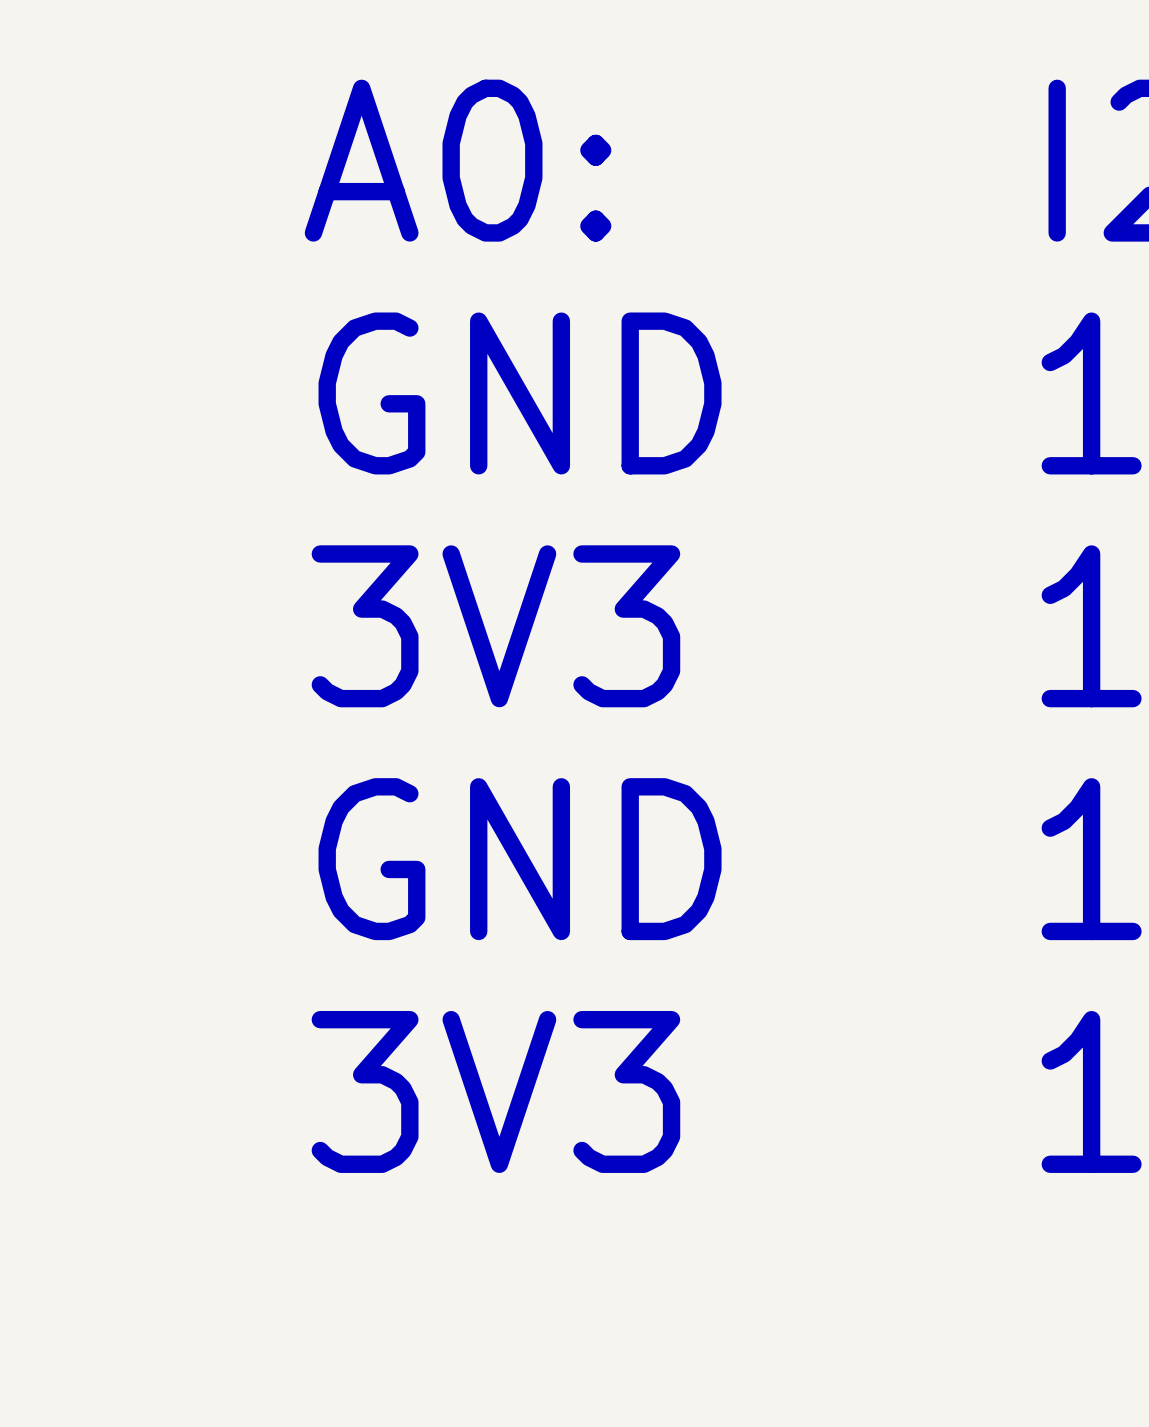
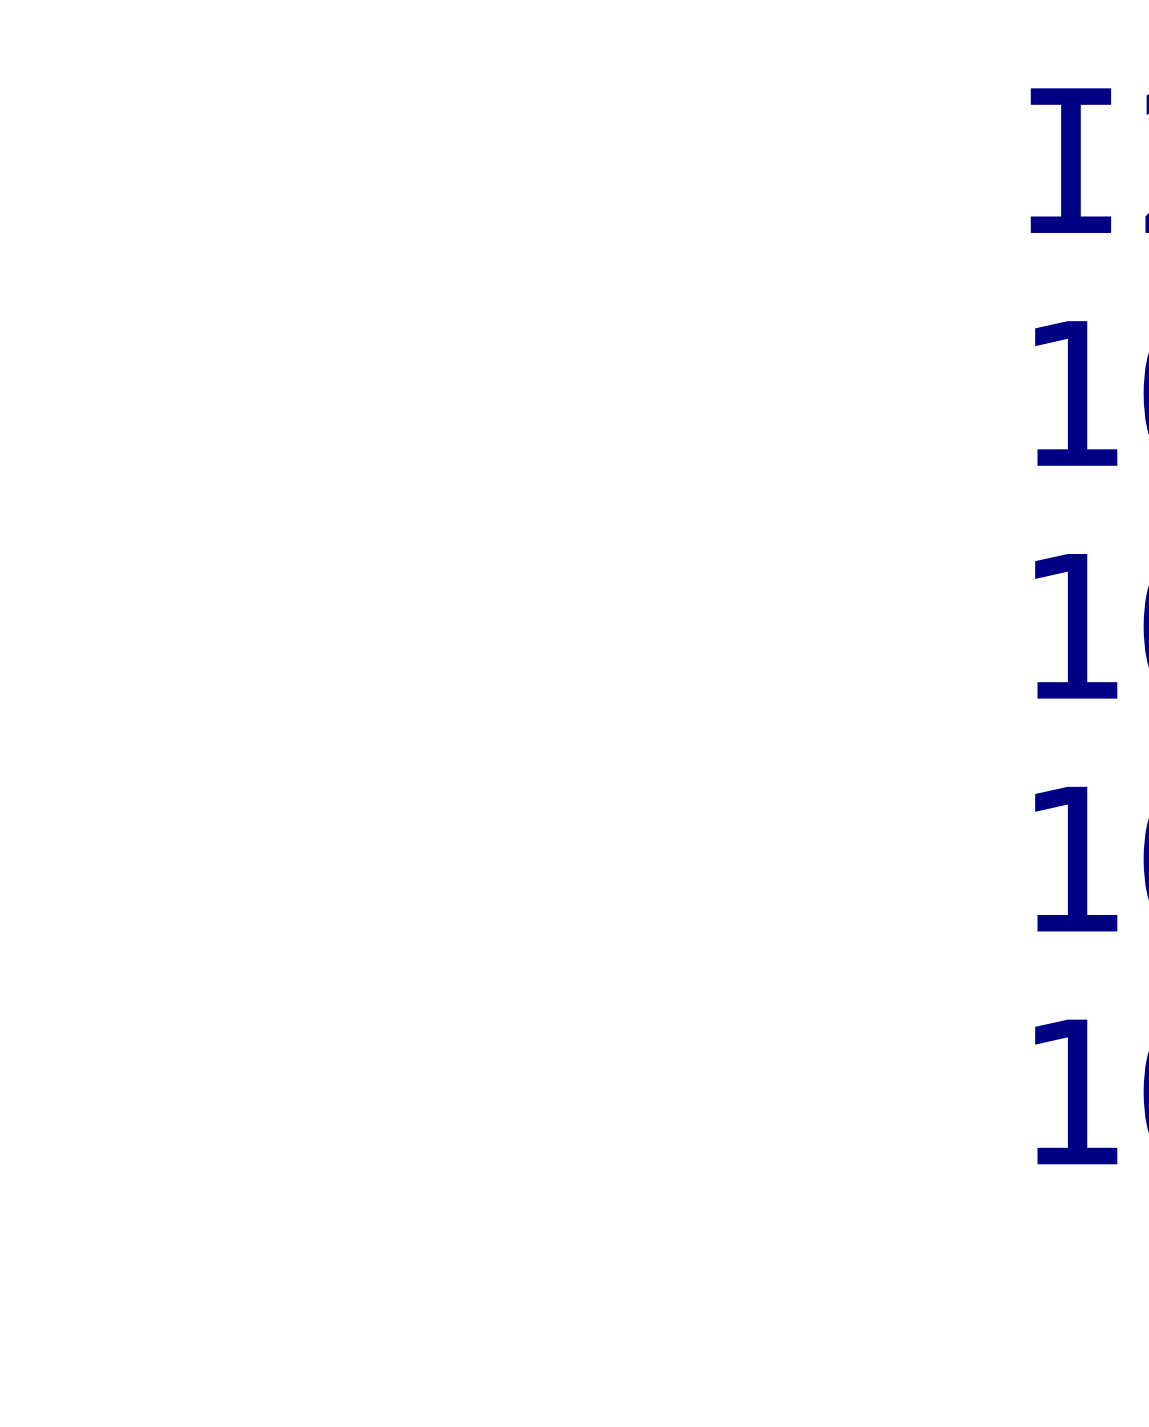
text: A0: (458, 160) -> none
text: GND (520, 393) -> none
text: 3V3 (495, 626) -> none
text: GND (520, 859) -> none
text: 3V3 (495, 1091) -> none

